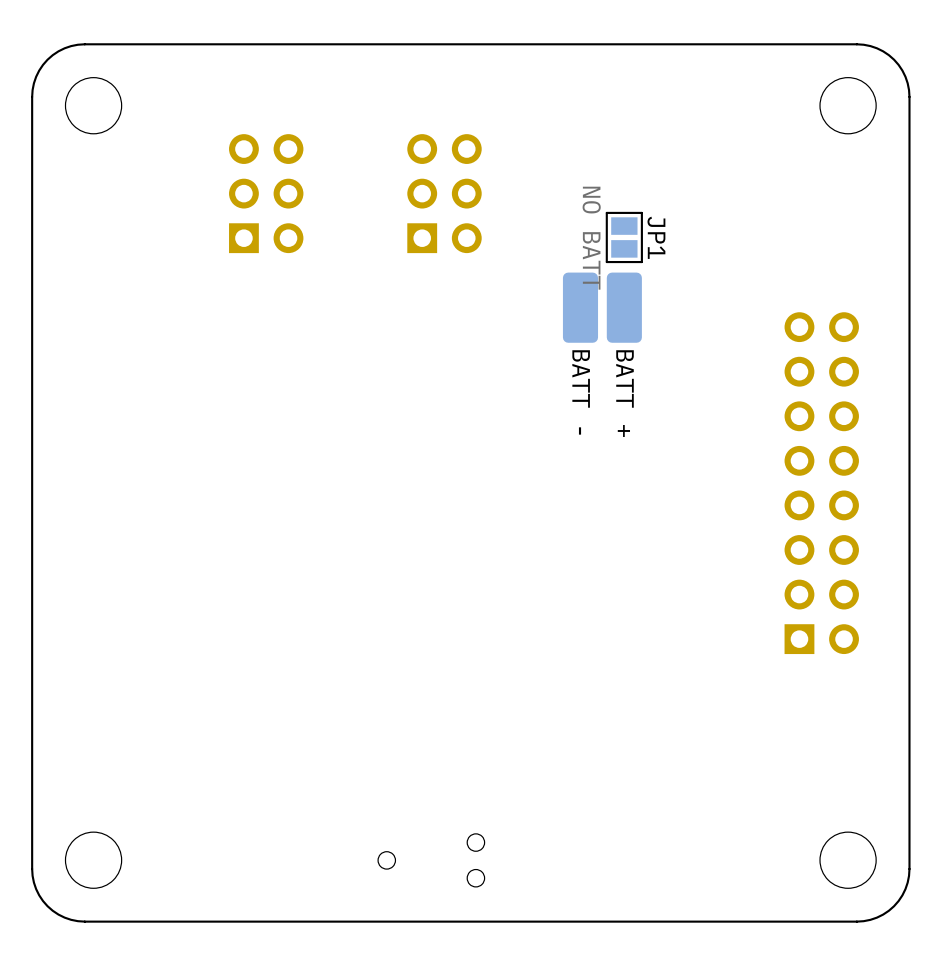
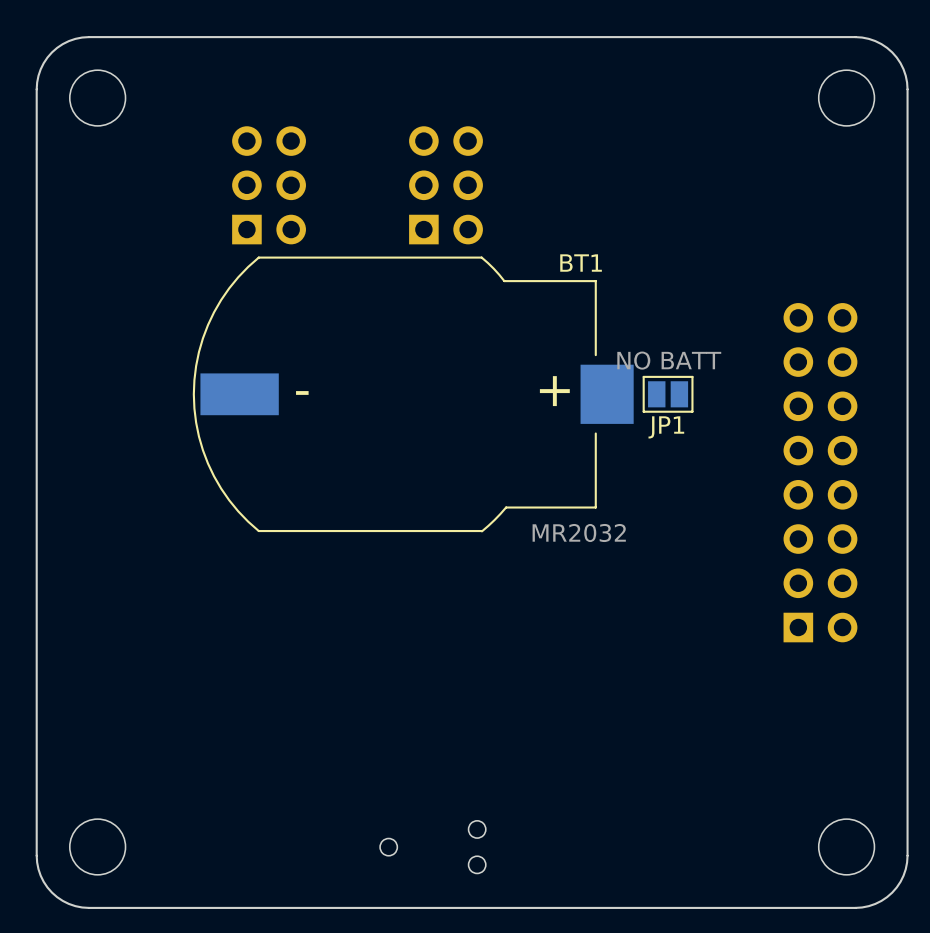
JP1 rotation: 0° (624, 237) -> 90° clockwise (668, 394)
JP1 position: (624, 237) -> (668, 394)
part: BATT - (580, 307) -> none
part: BATT + (624, 307) -> none
text: none -> - (302, 392)
text: none -> + (554, 391)
BT1: none -> MR2032 (413, 394)

